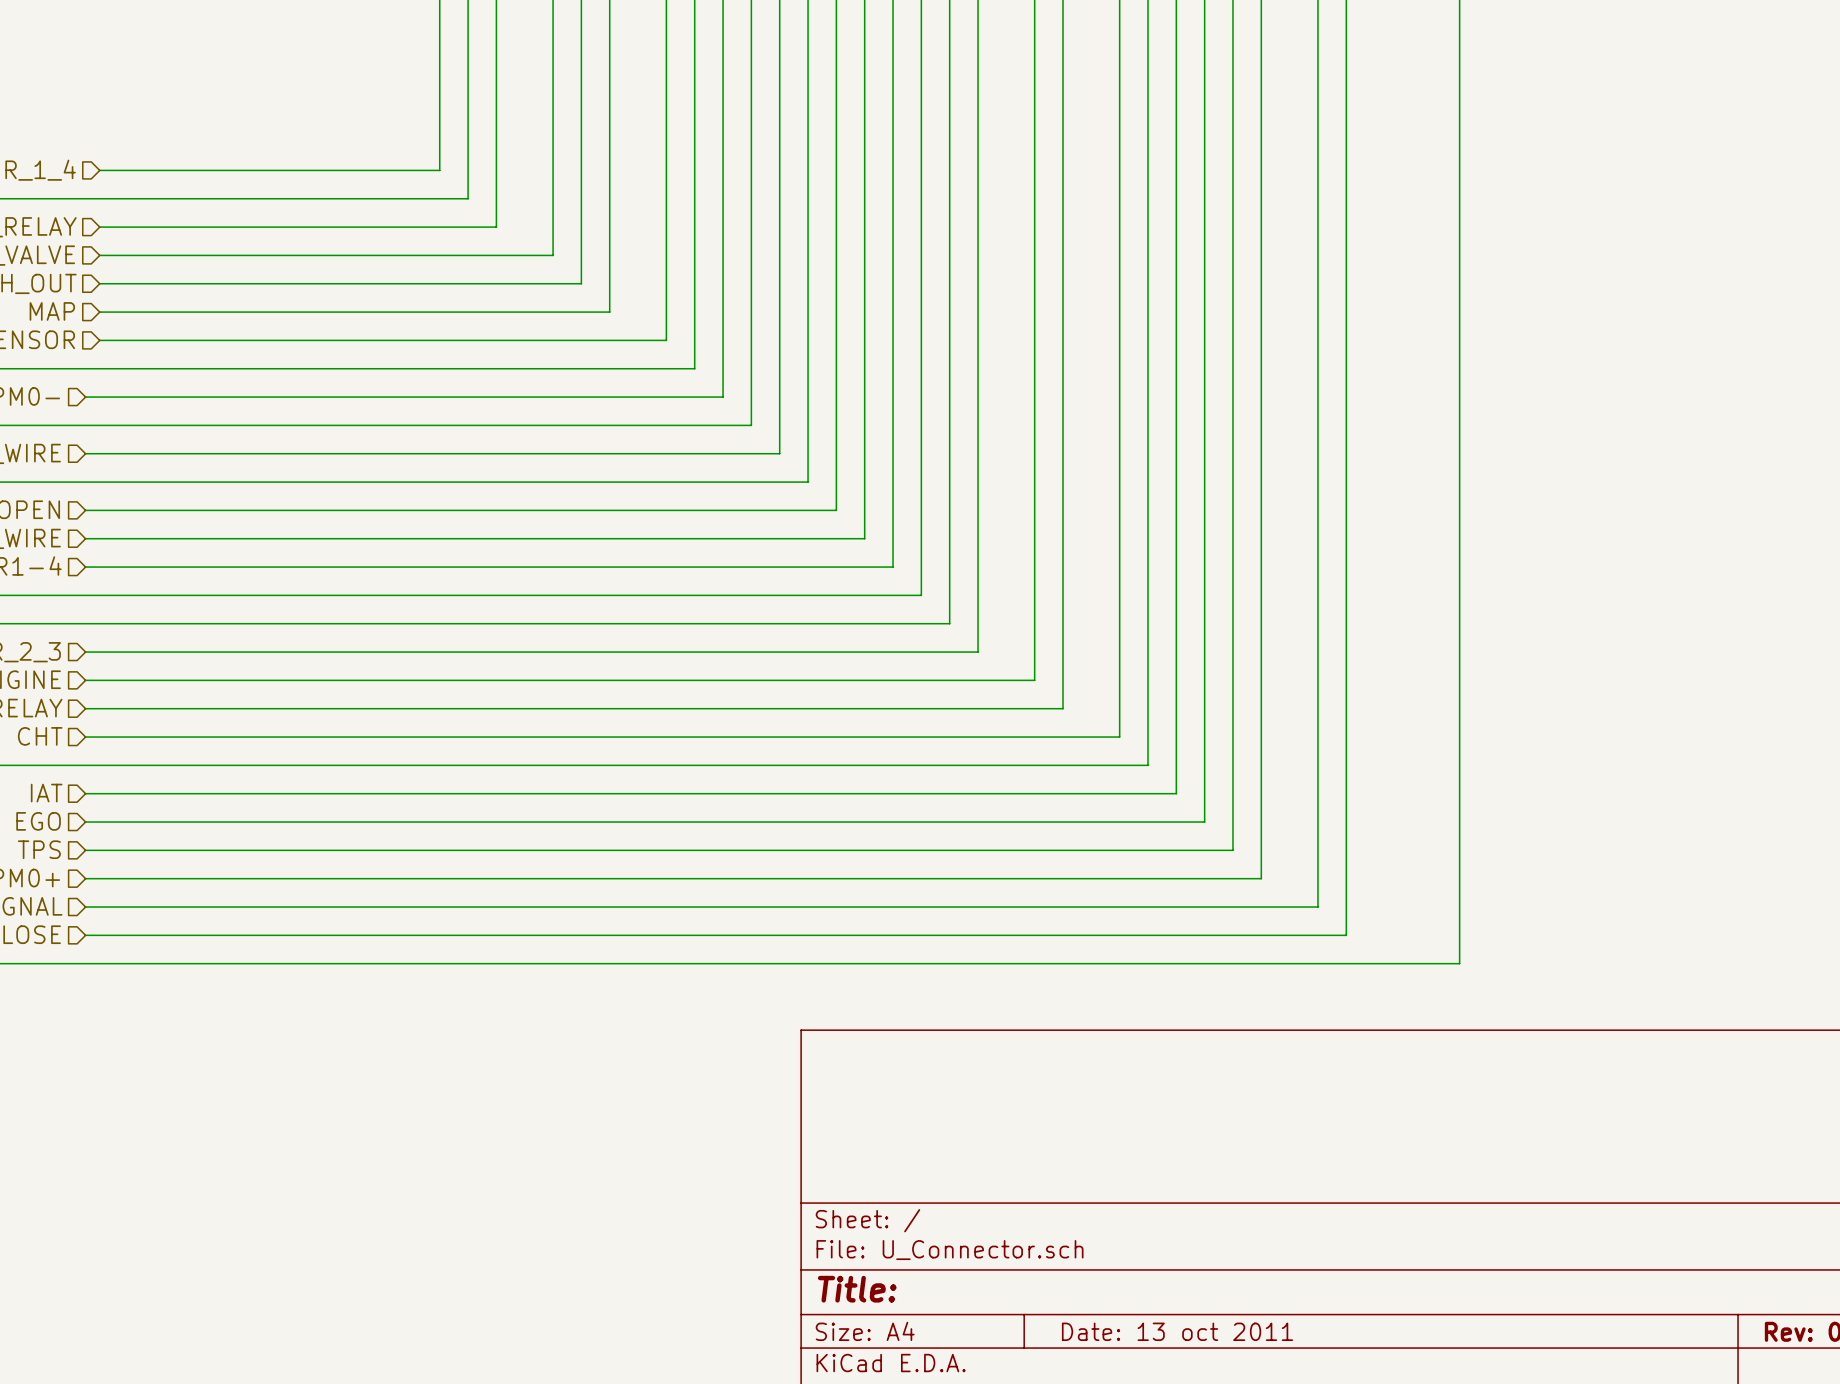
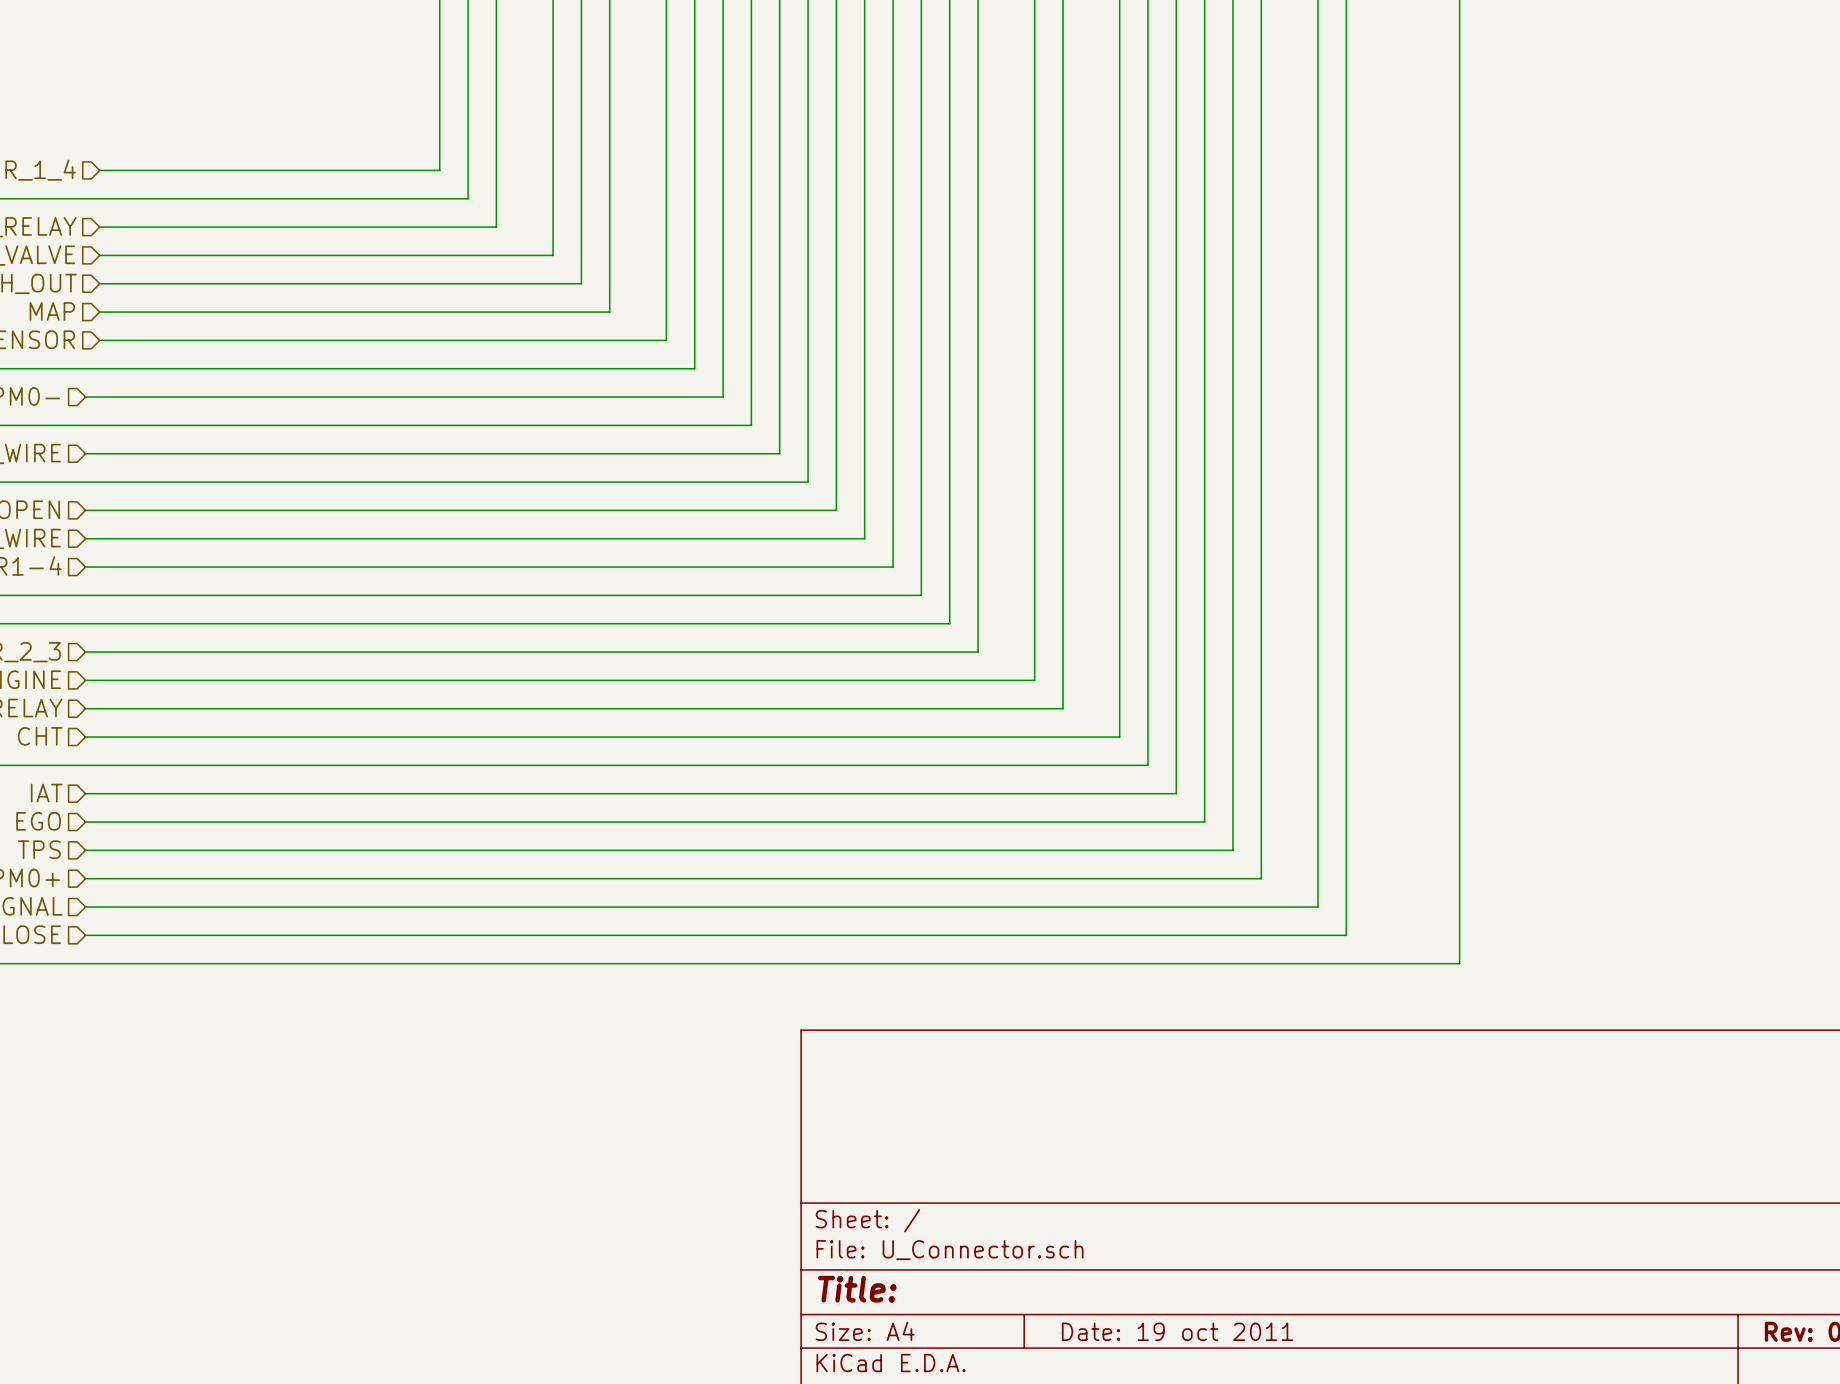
title block: Date: 13 oct 2011 (1177, 1331) -> Date: 19 oct 2011 (1177, 1331)

